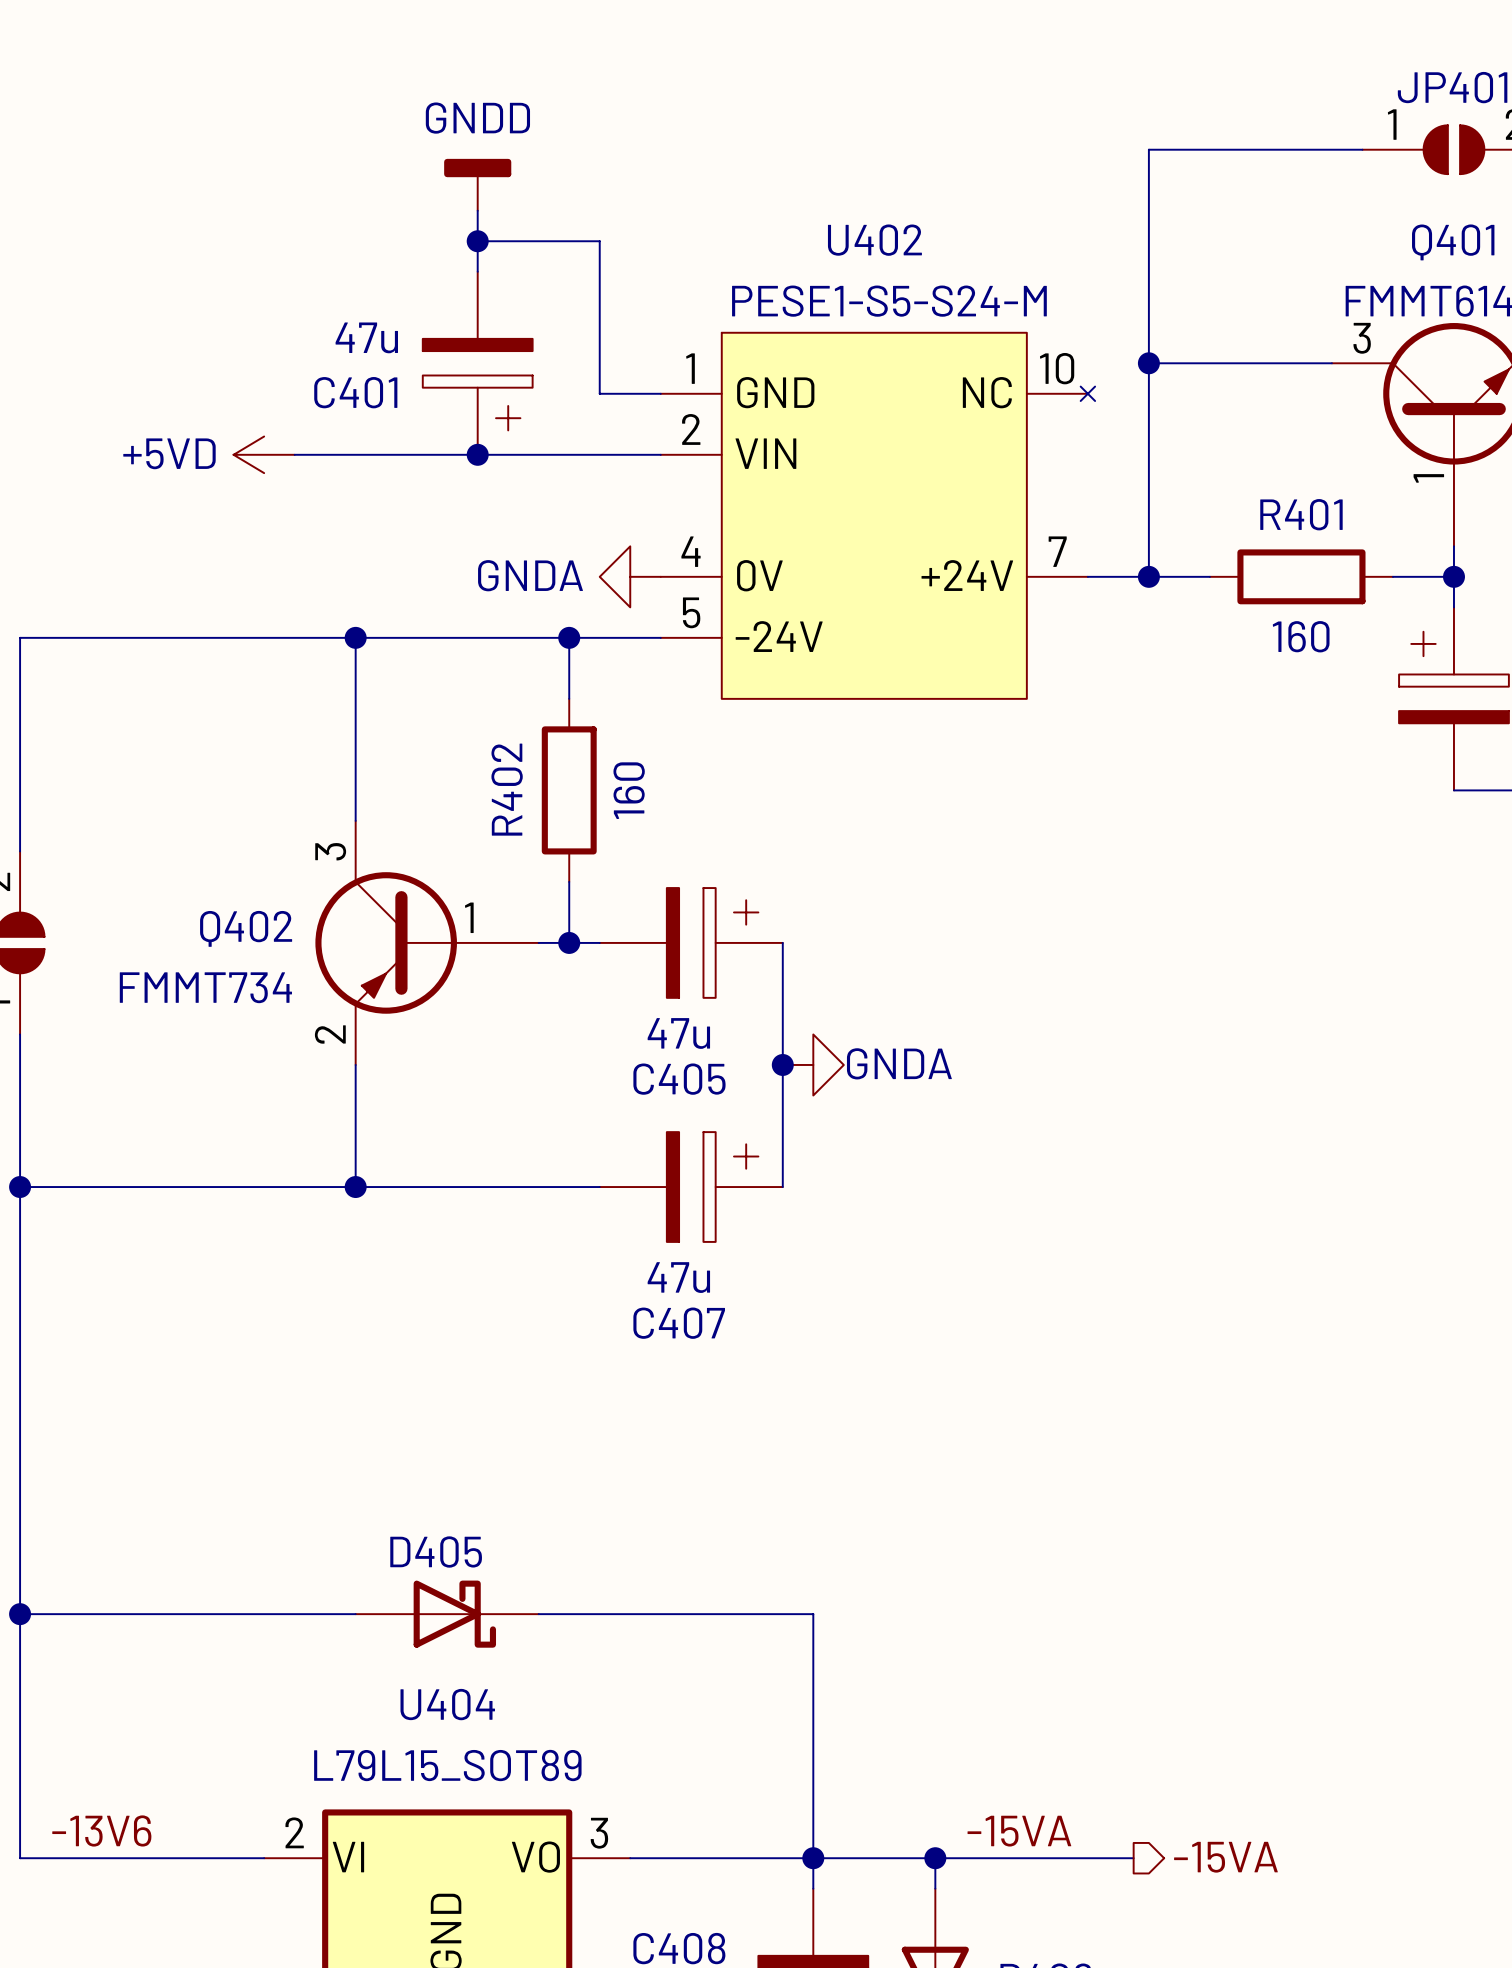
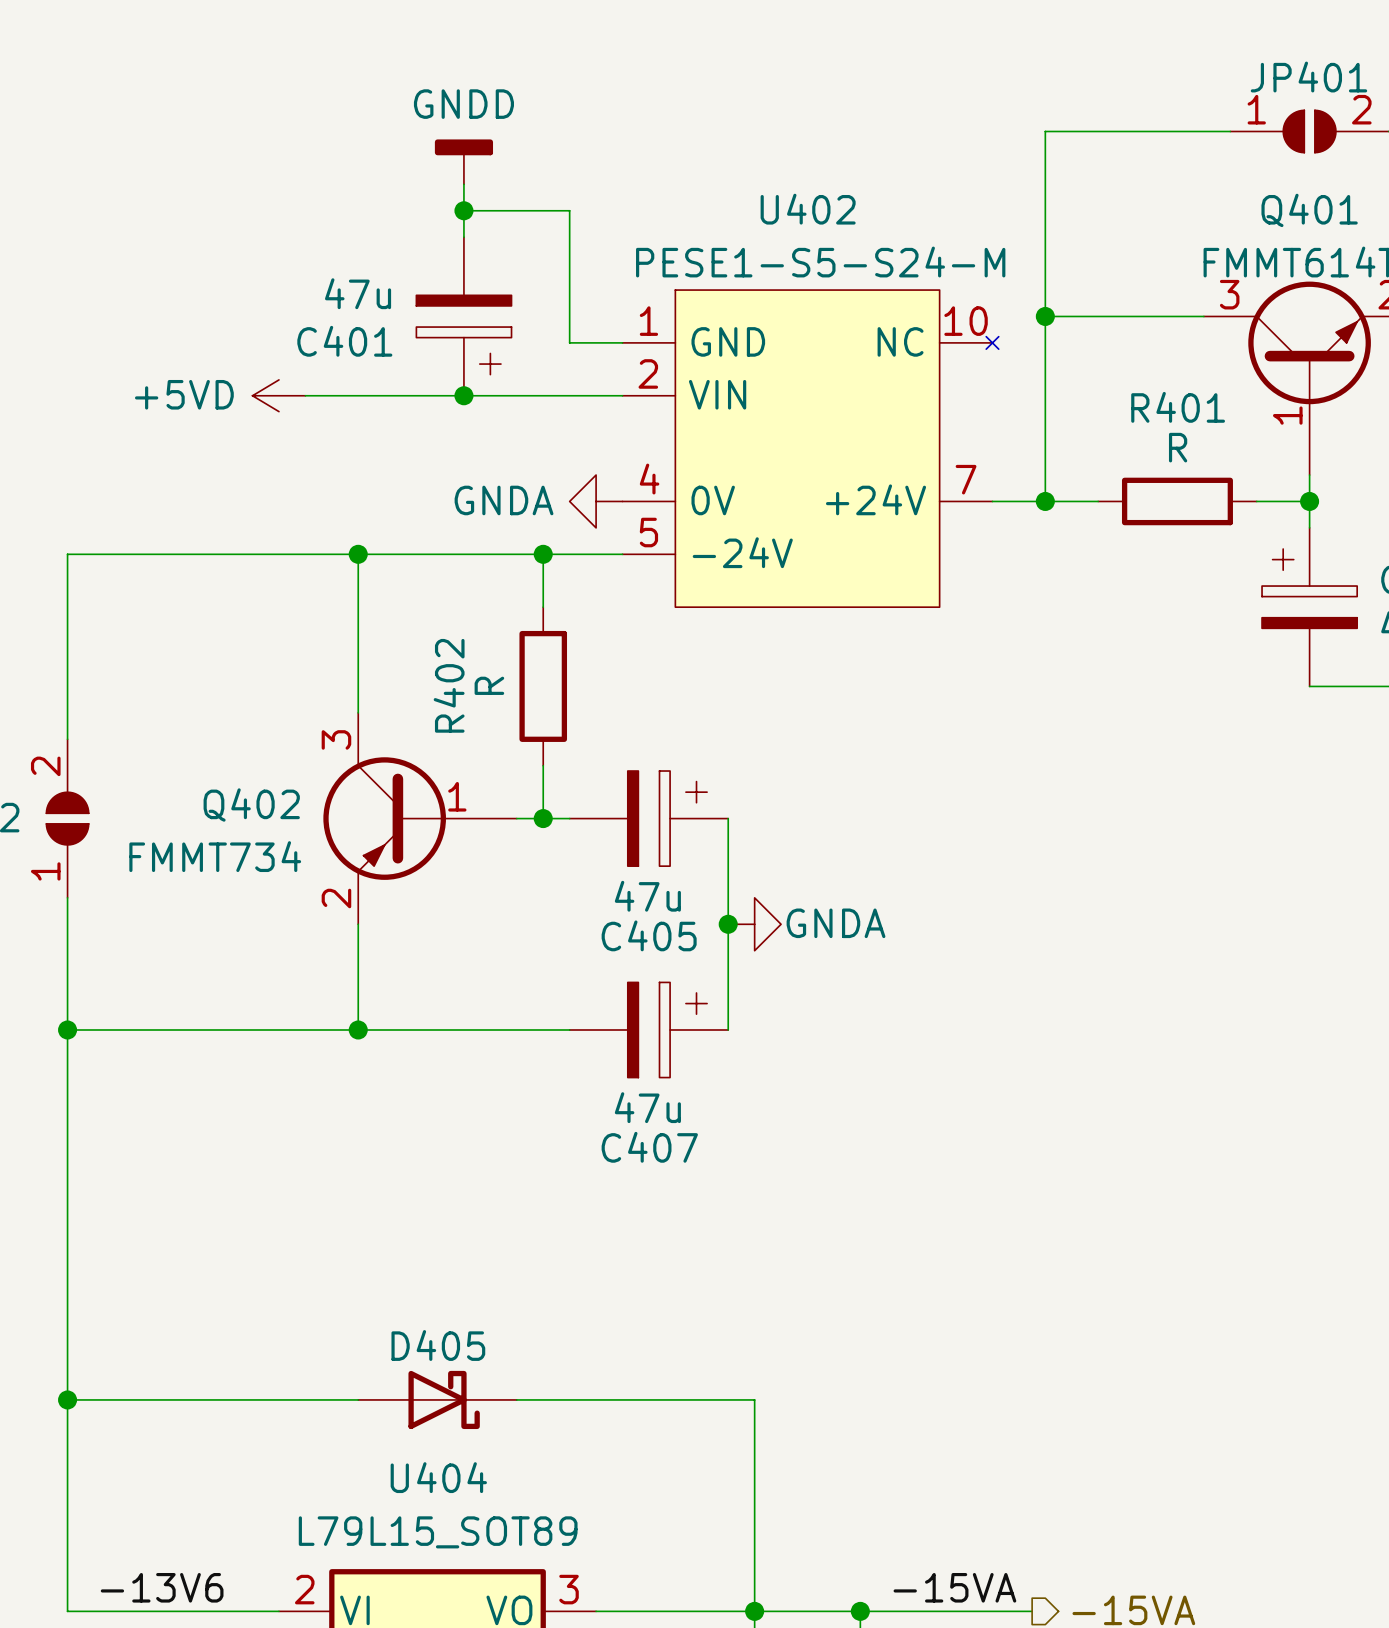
R401 name position: R401 (1301, 514) -> R401 (1178, 407)
R401 value: 160 (1301, 636) -> R (1178, 447)
R402 name position: R402 (507, 789) -> R402 (449, 685)
R402 value: 160 (629, 790) -> R (489, 685)

